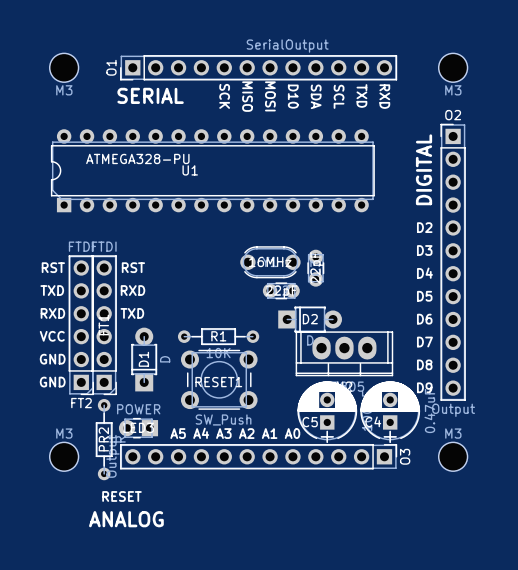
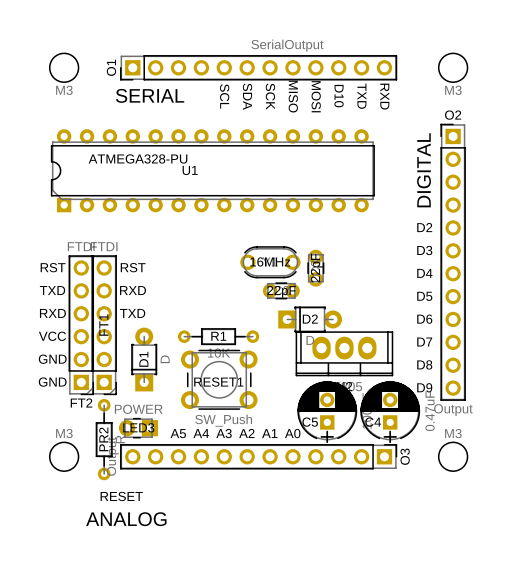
text: none -> D10 (339, 96)
text: SCK (224, 96) -> SCL (224, 96)
text: MISO (247, 96) -> SDA (247, 96)
text: MOSI (270, 96) -> SCK (270, 96)
text: D10 (293, 96) -> MISO (293, 96)
text: SDA (316, 96) -> none
text: none -> MOSI (316, 96)
text: SCL (339, 96) -> none

